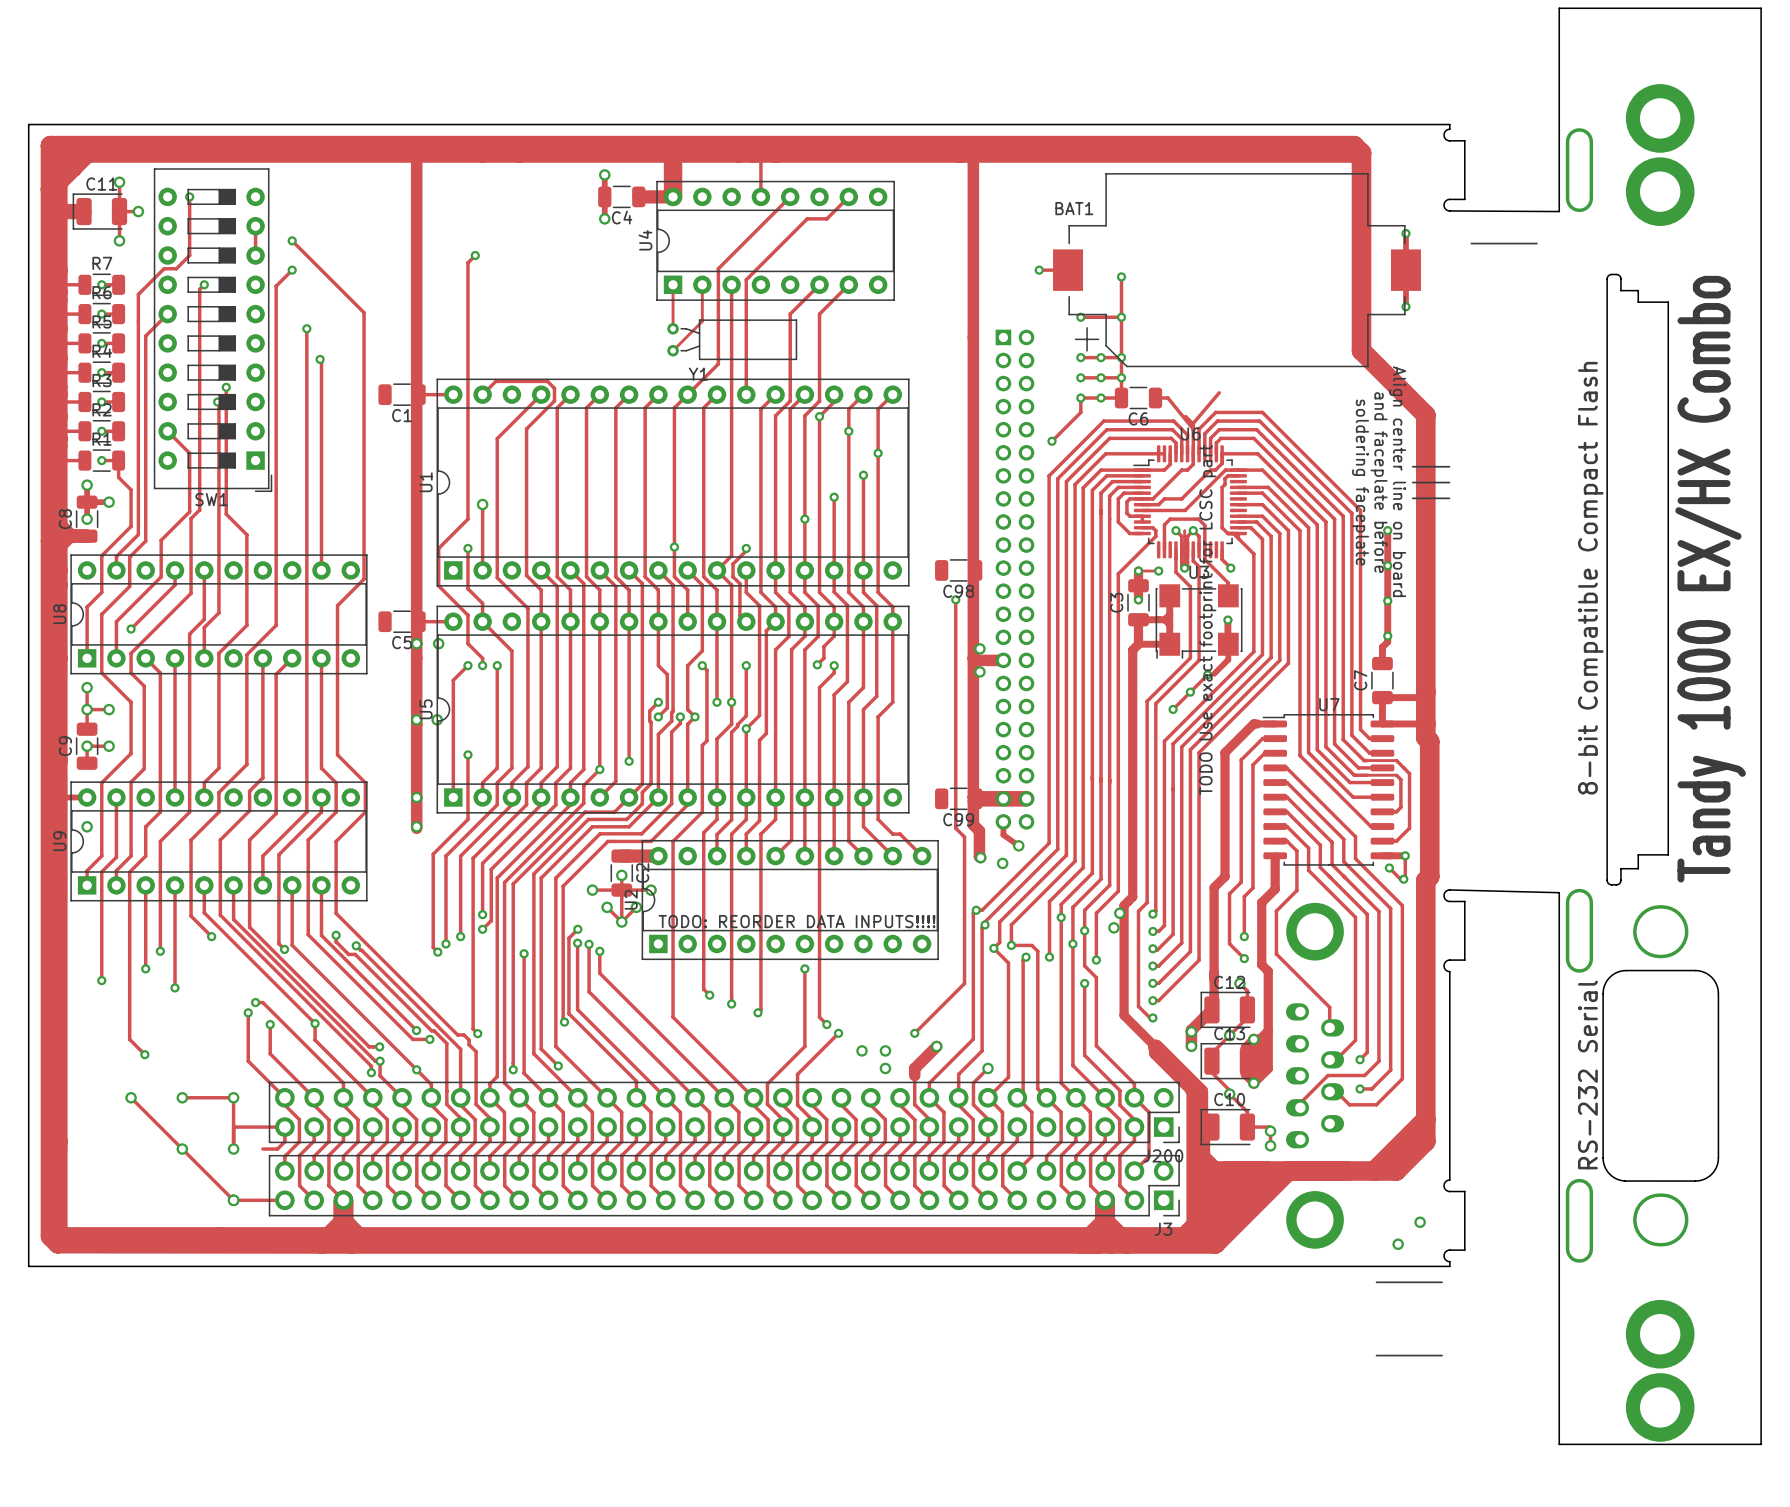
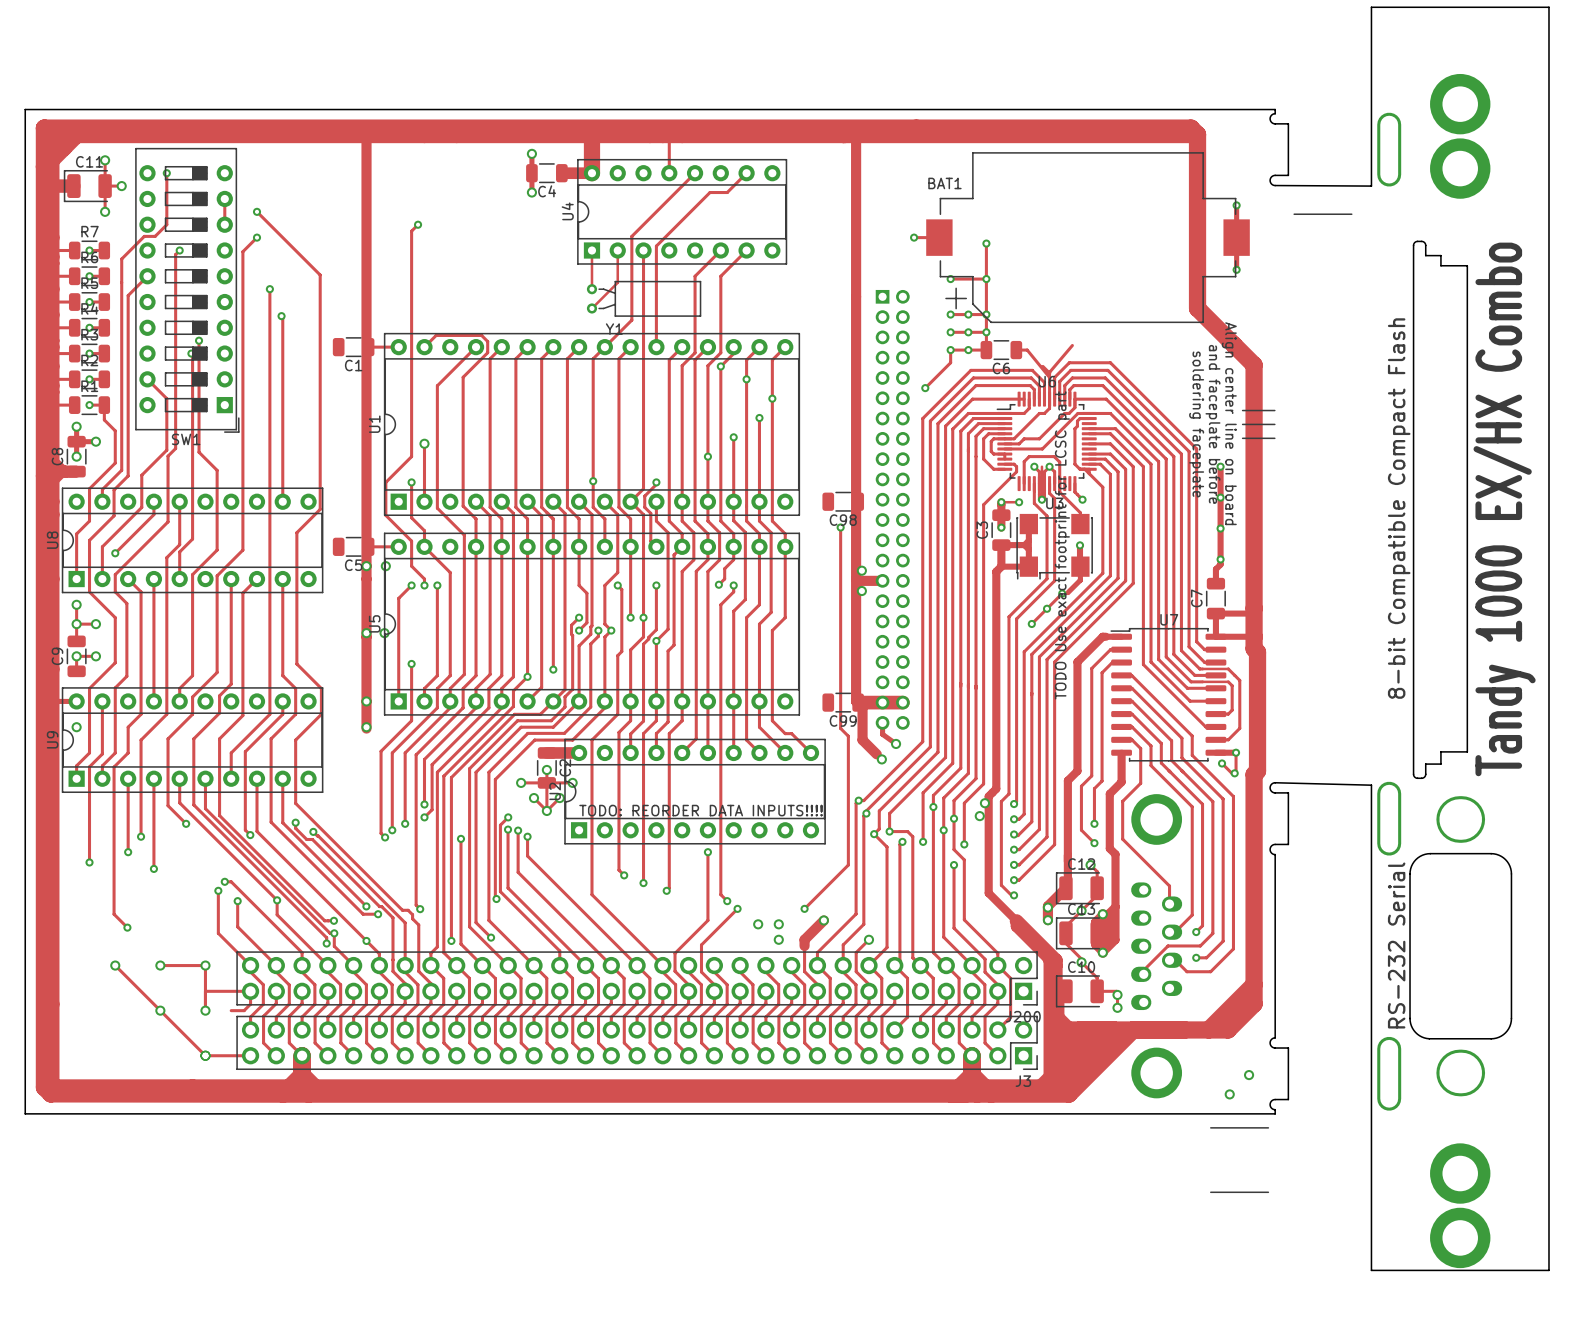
track: (973, 797) (975, 798) (973, 801) (973, 824) (979, 830) (980, 857) -> none
track: none -> (857, 702) (862, 707) (862, 740) (876, 754)
via: (980, 857) -> none

